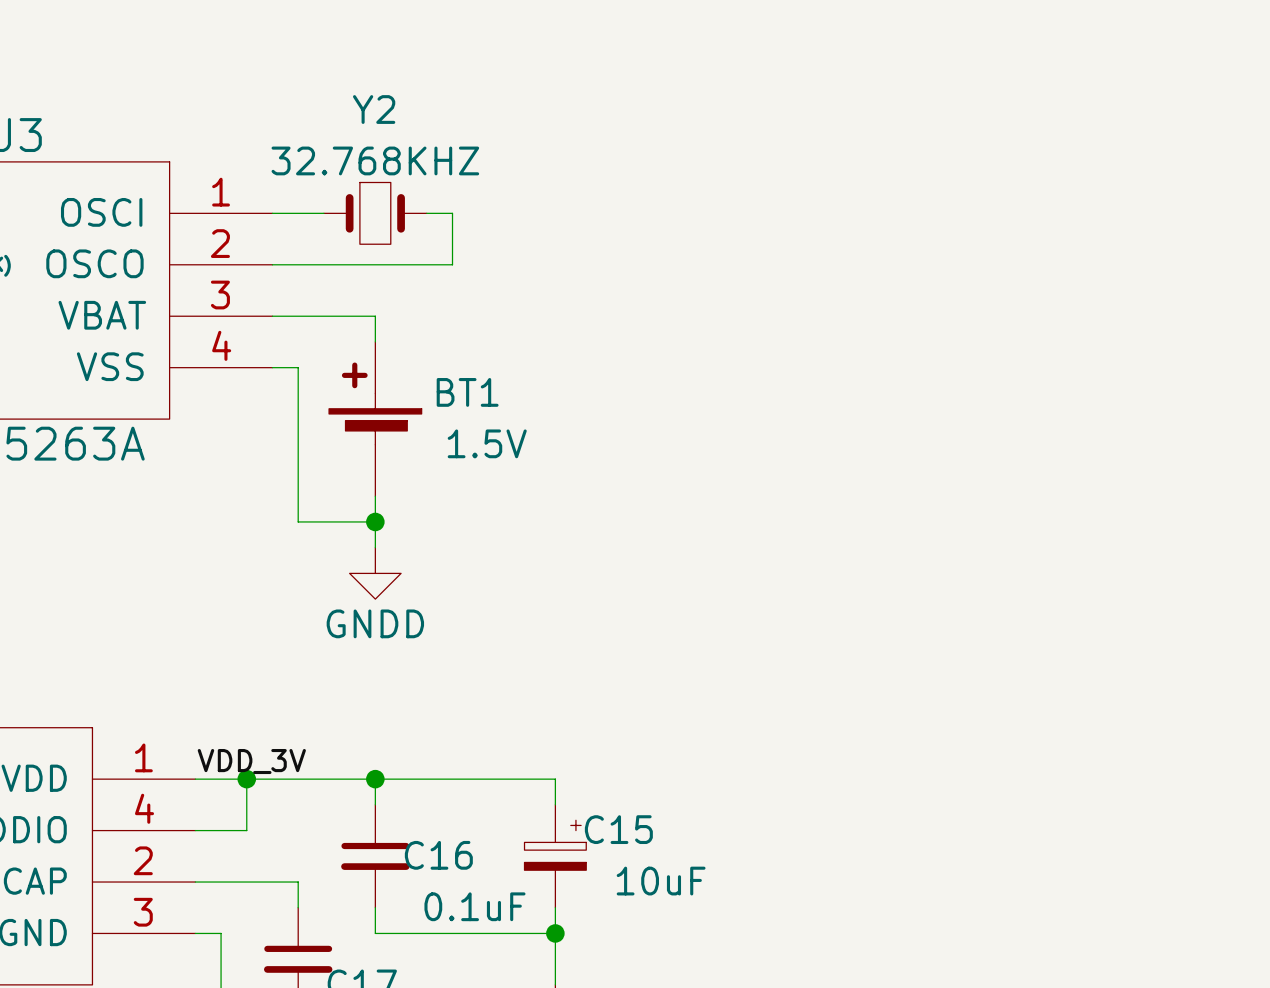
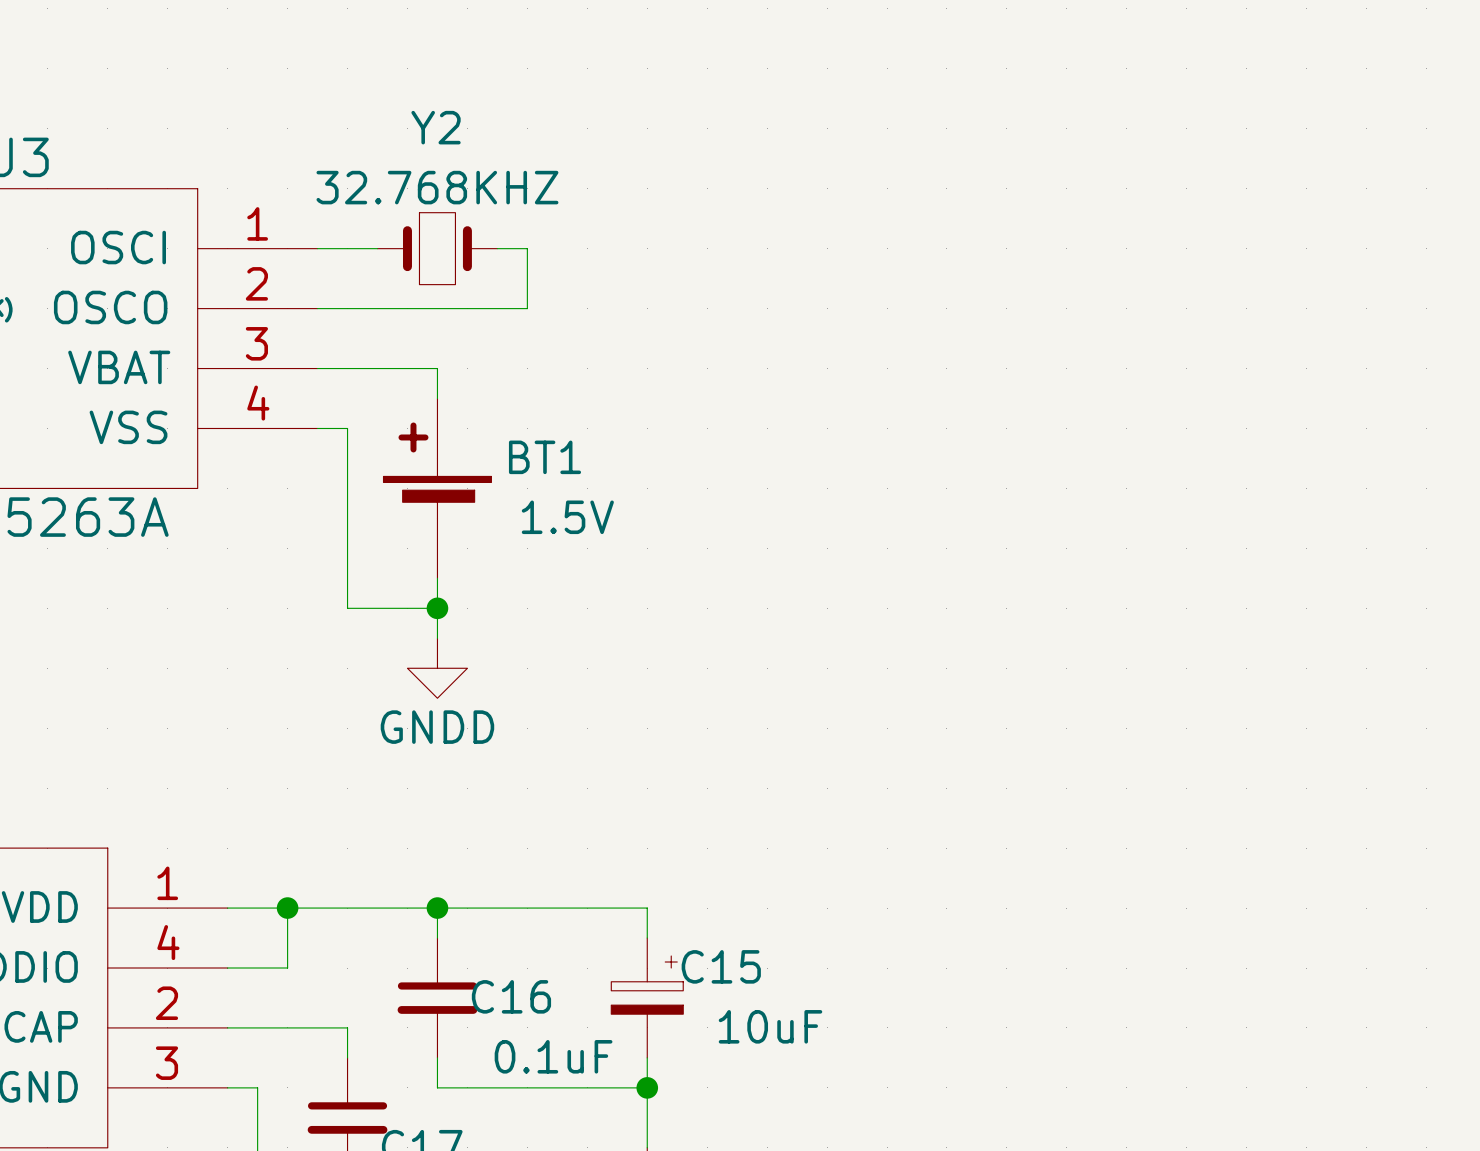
label: VDD_3V (251, 761) -> none

